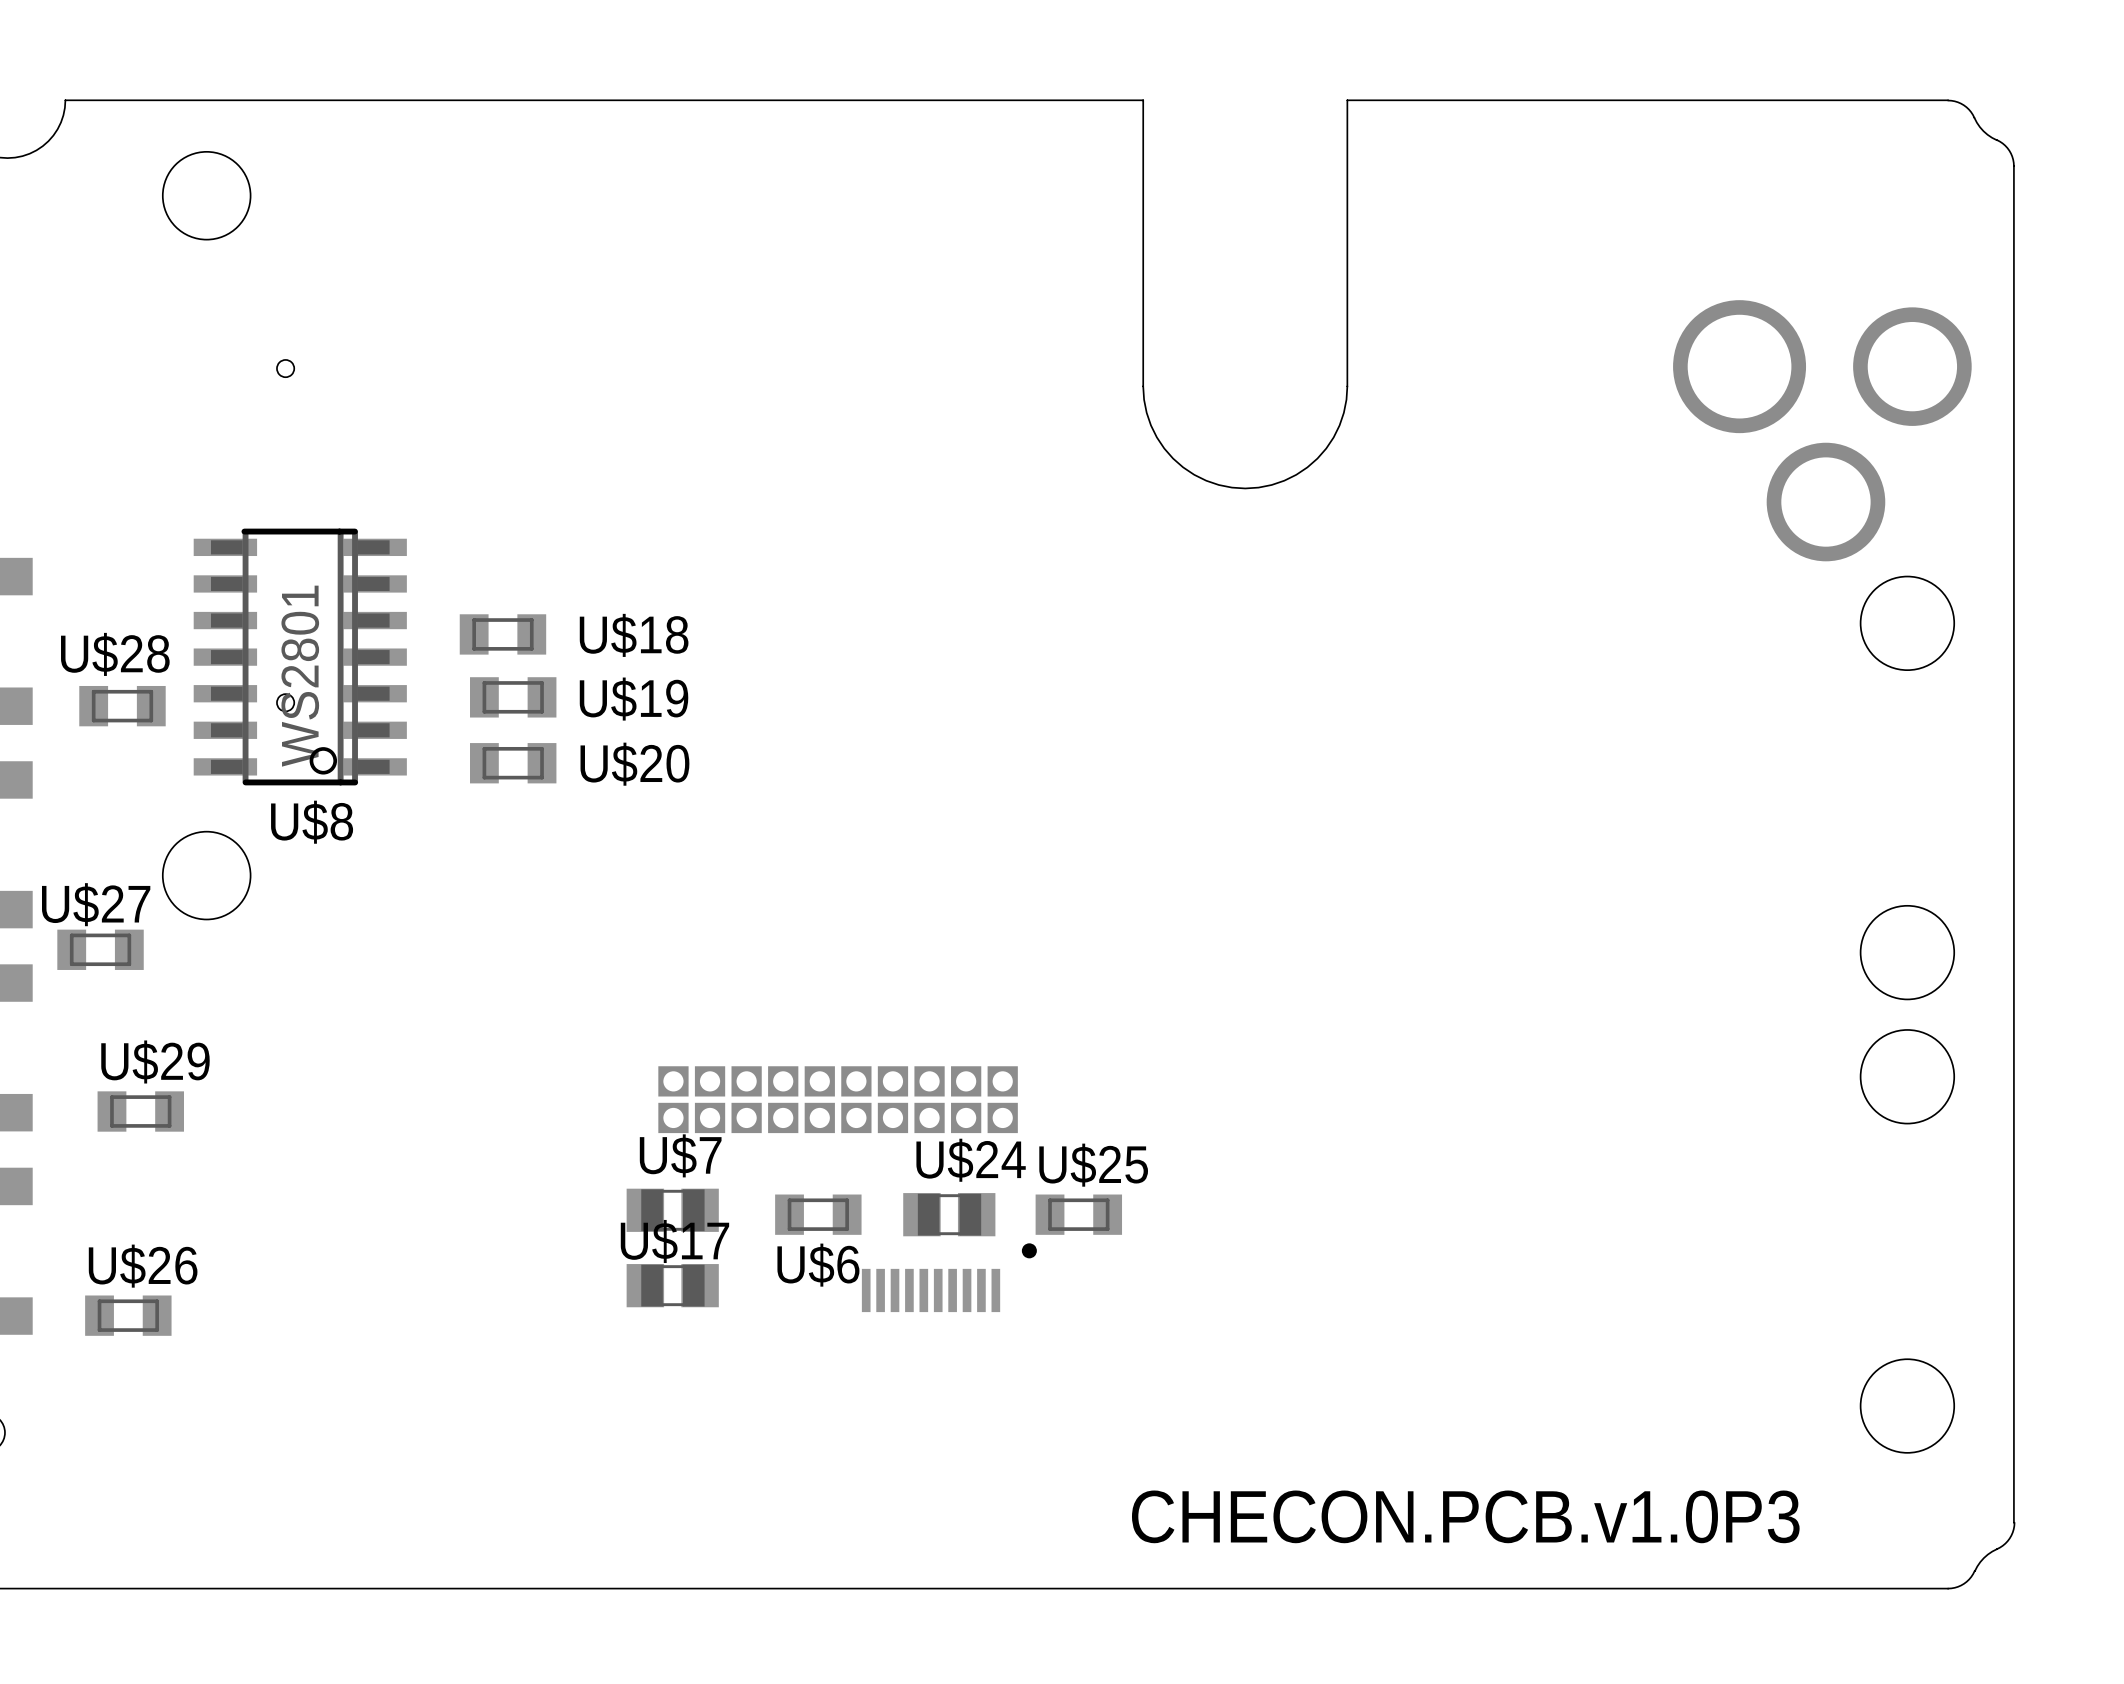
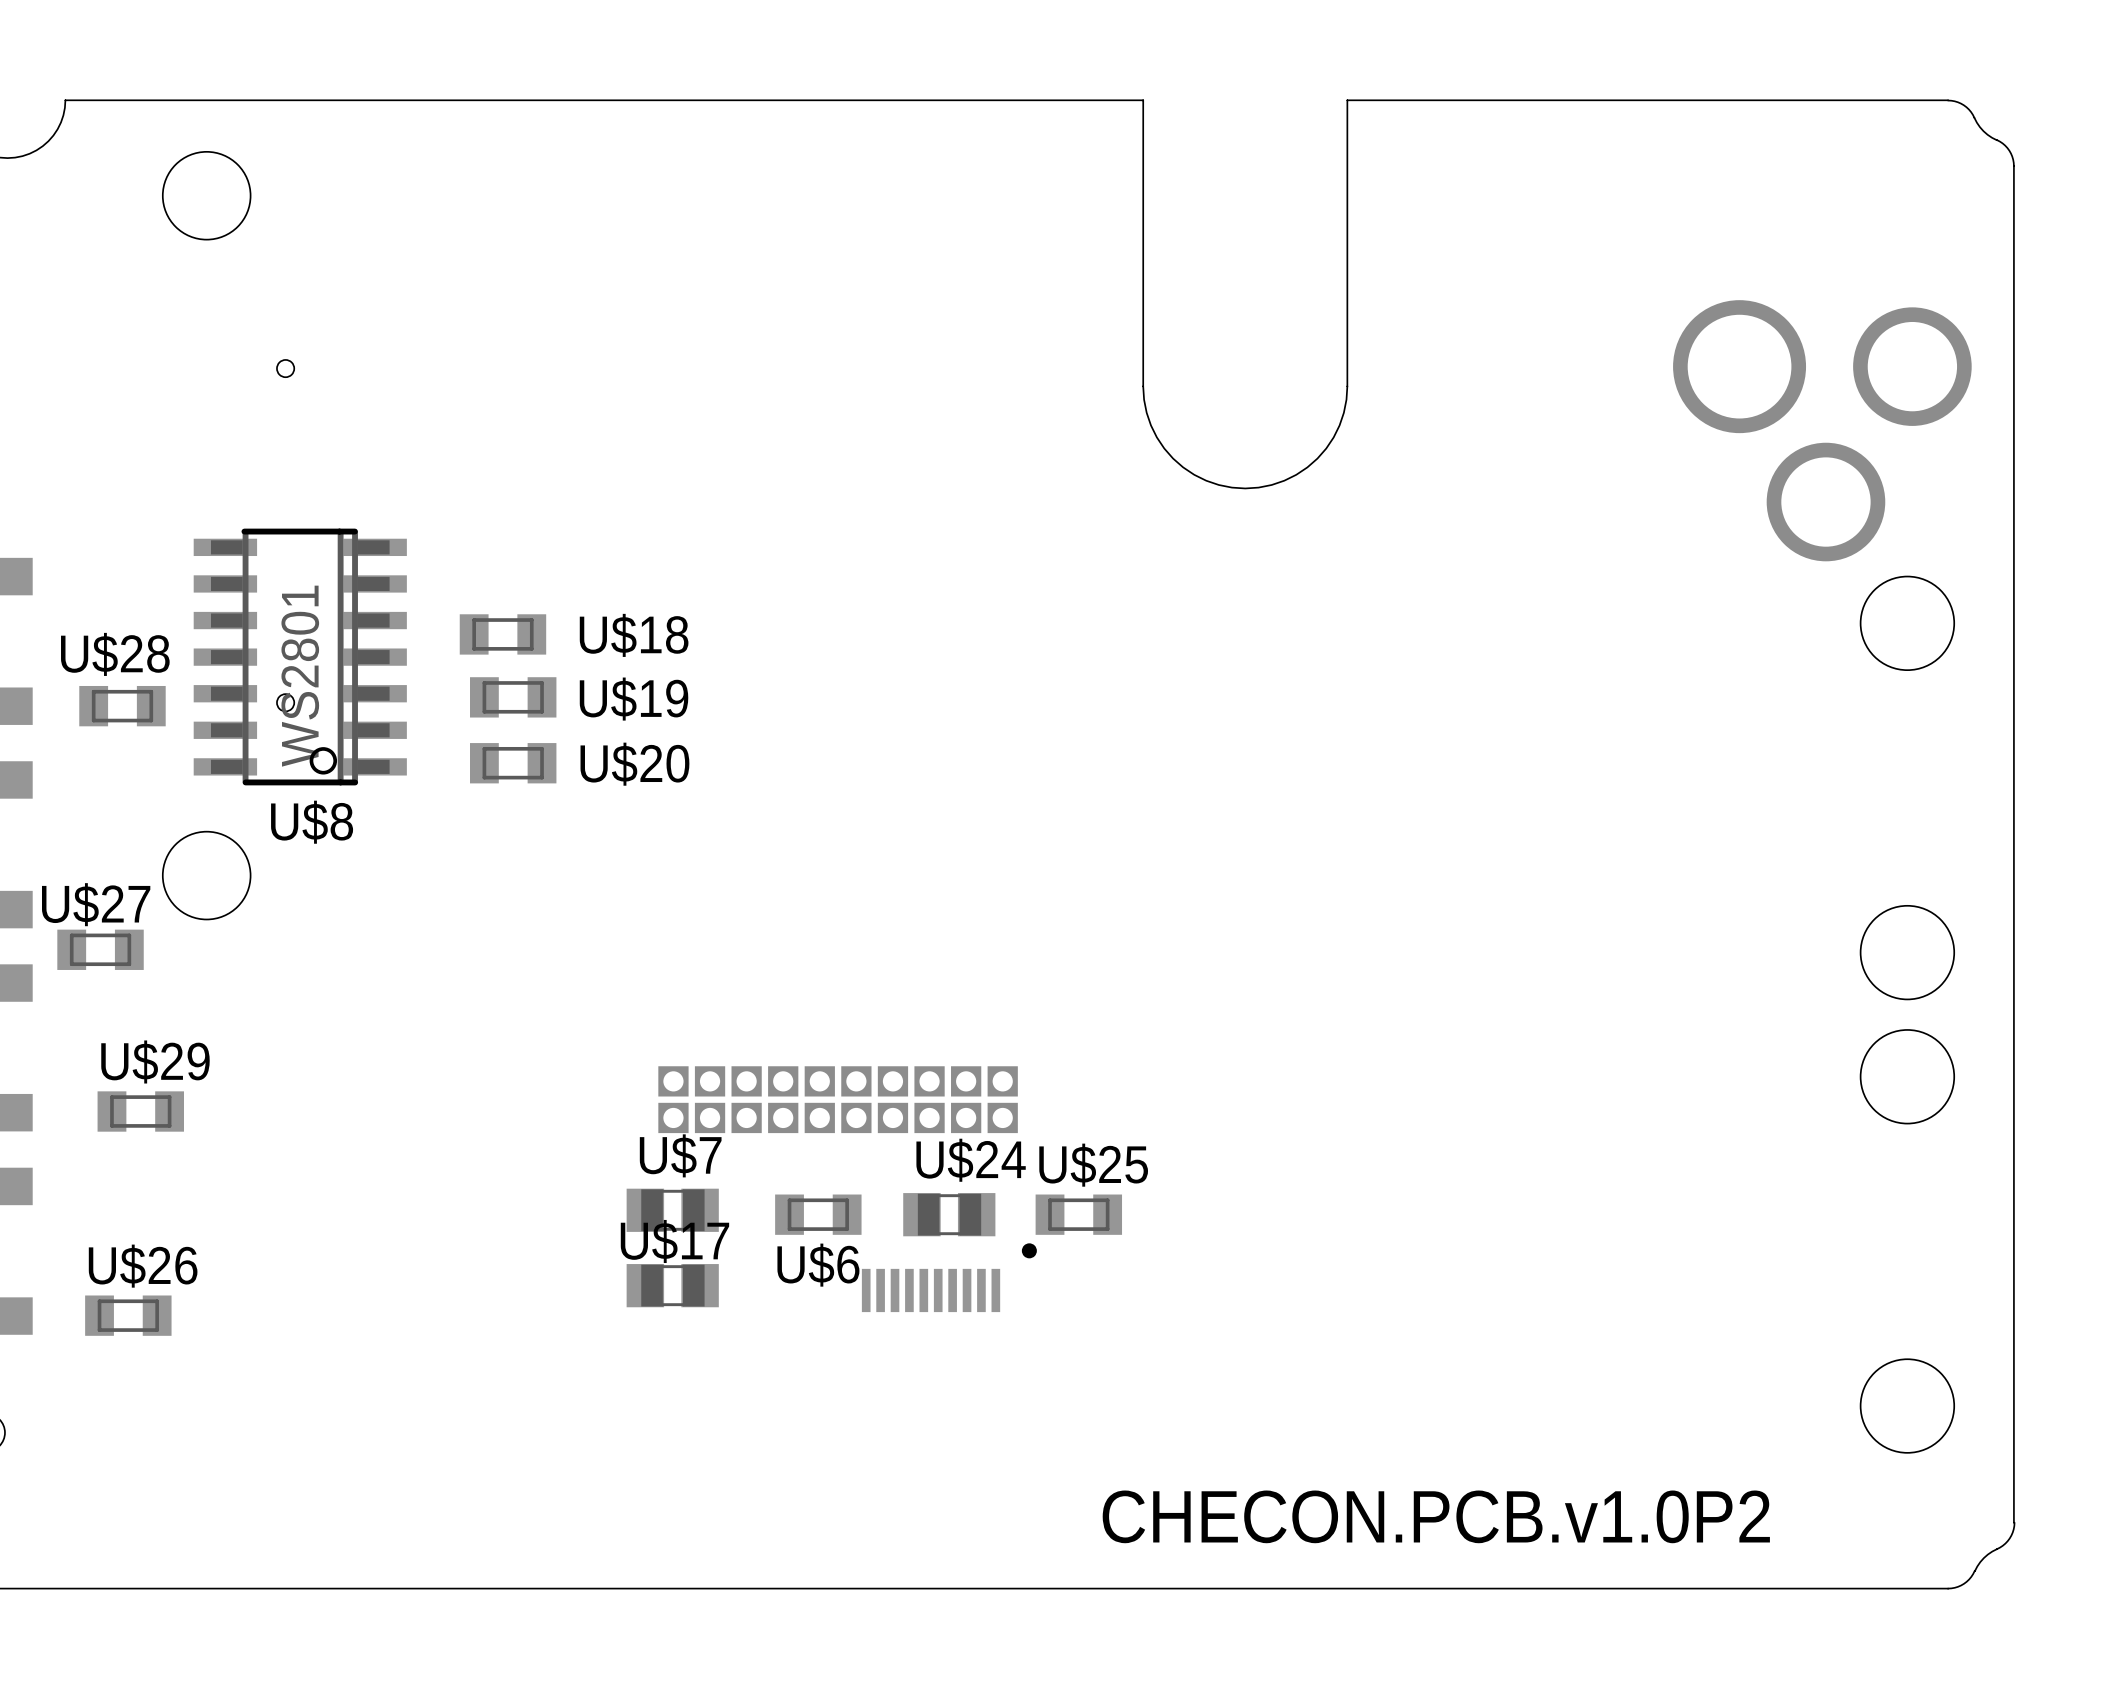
text: CHECON.PCB.v1.0P3 (1465, 1516) -> CHECON.PCB.v1.0P2 (1436, 1516)

